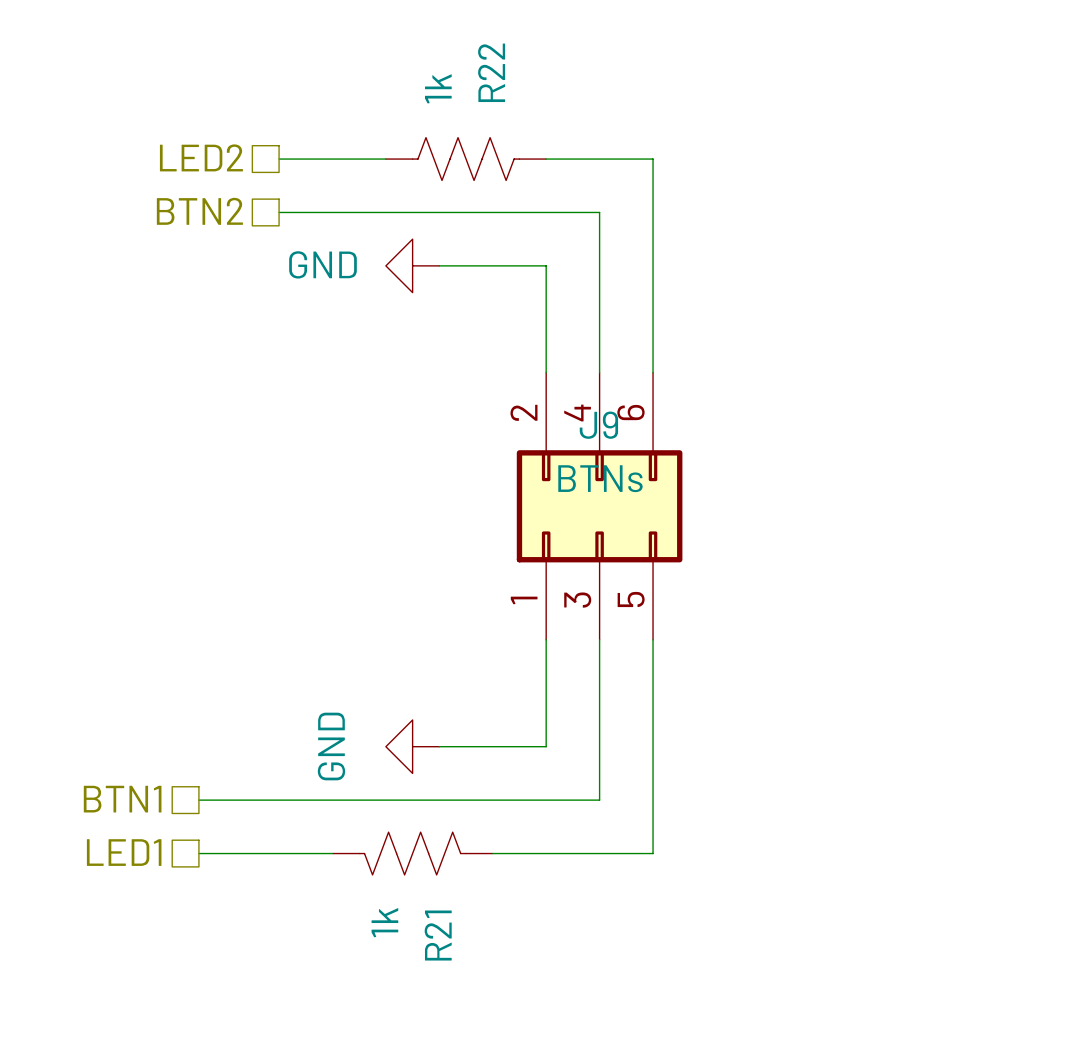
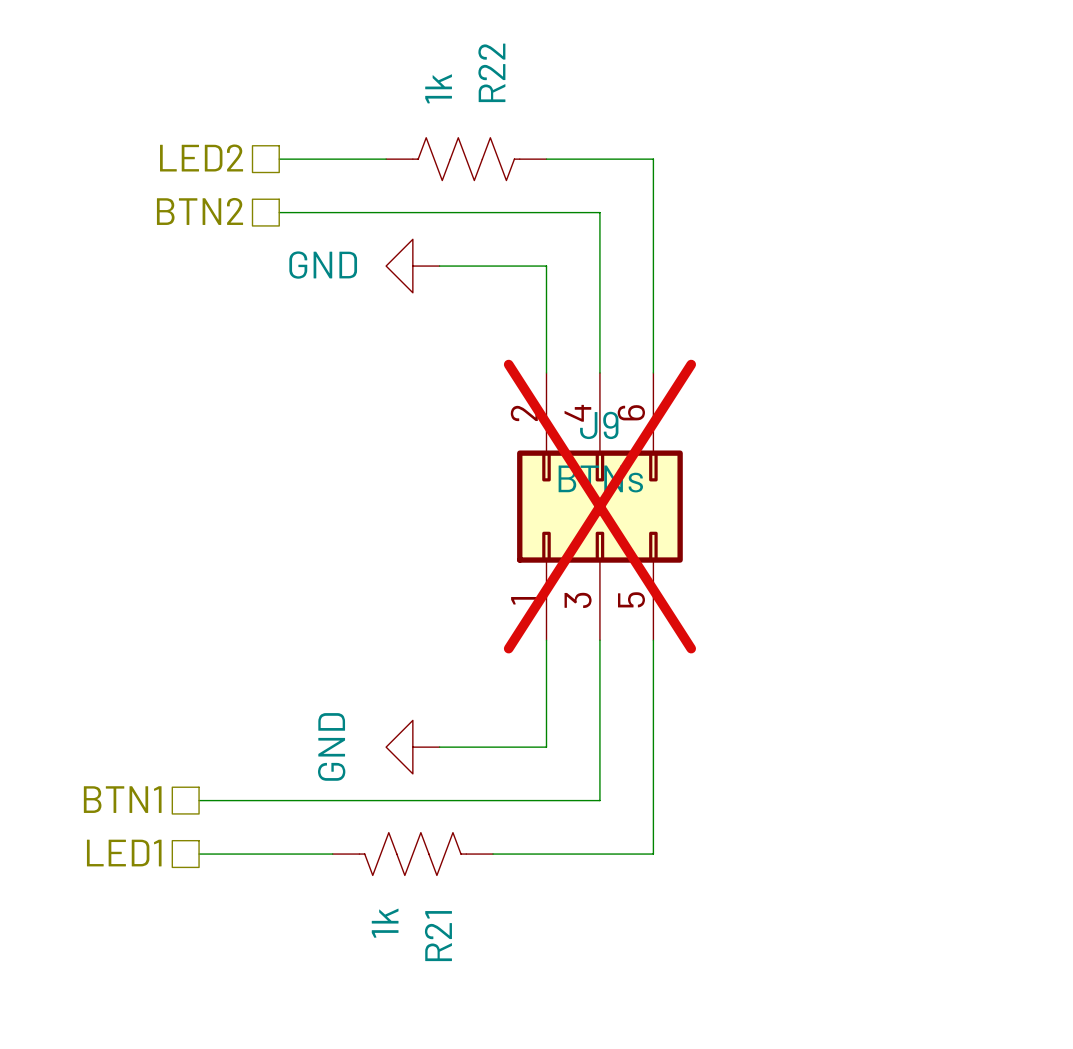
J9 do-not-place cross: none -> (599, 506)

